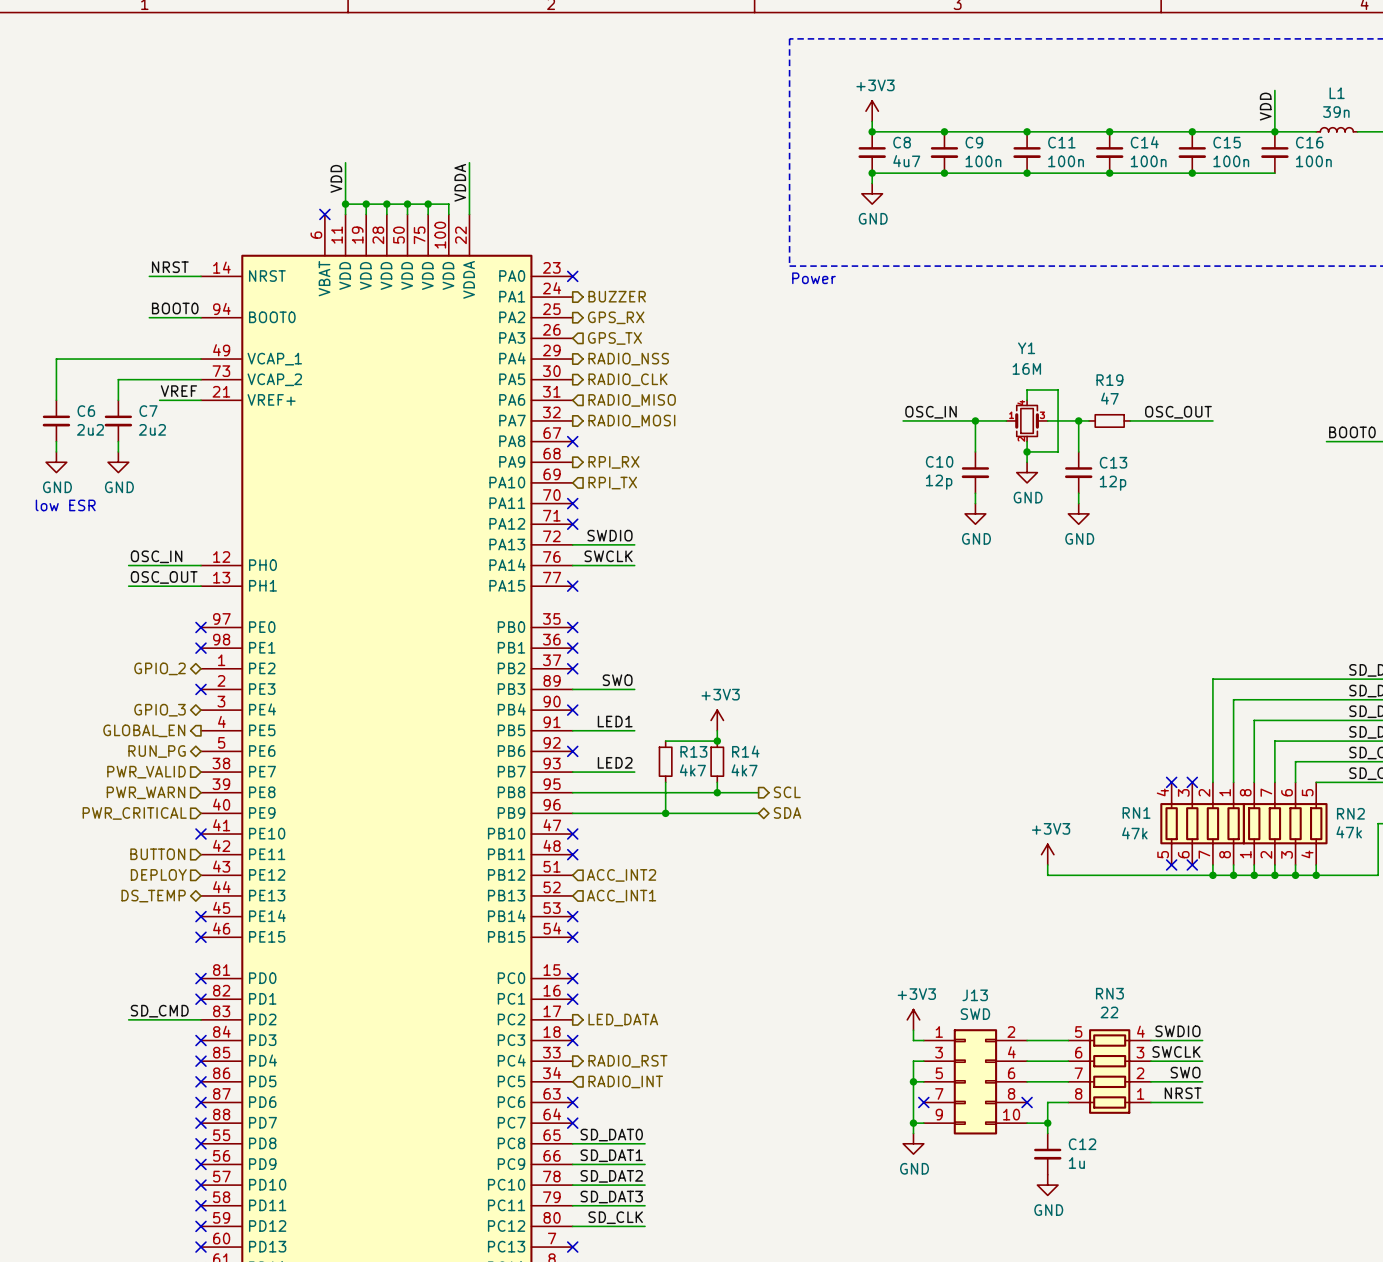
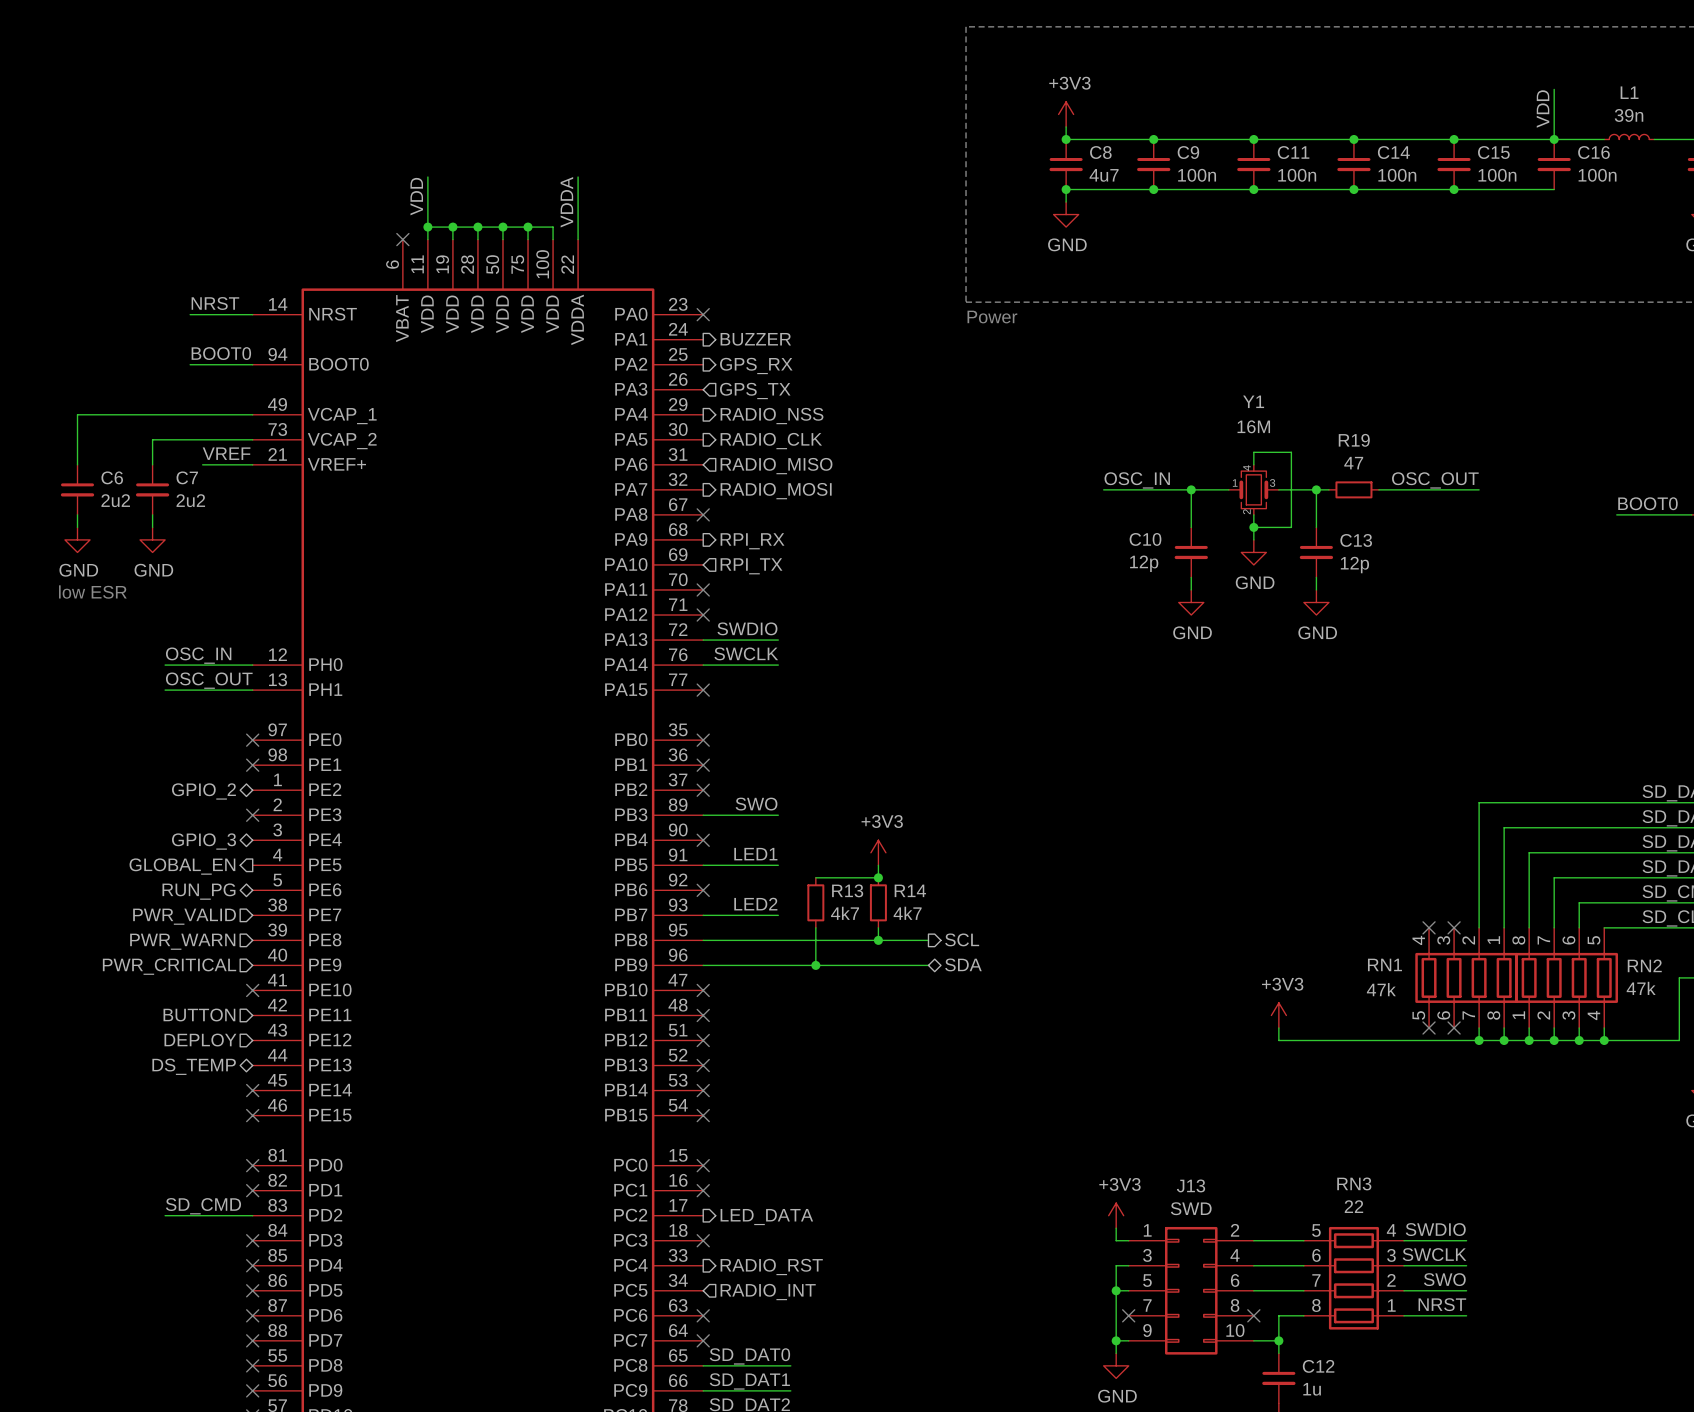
no-connect mark: none -> (703, 1040)
hierarchical label: ACC_INT2 (621, 875) -> none
no-connect mark: none -> (703, 1065)
hierarchical label: ACC_INT1 (621, 896) -> none

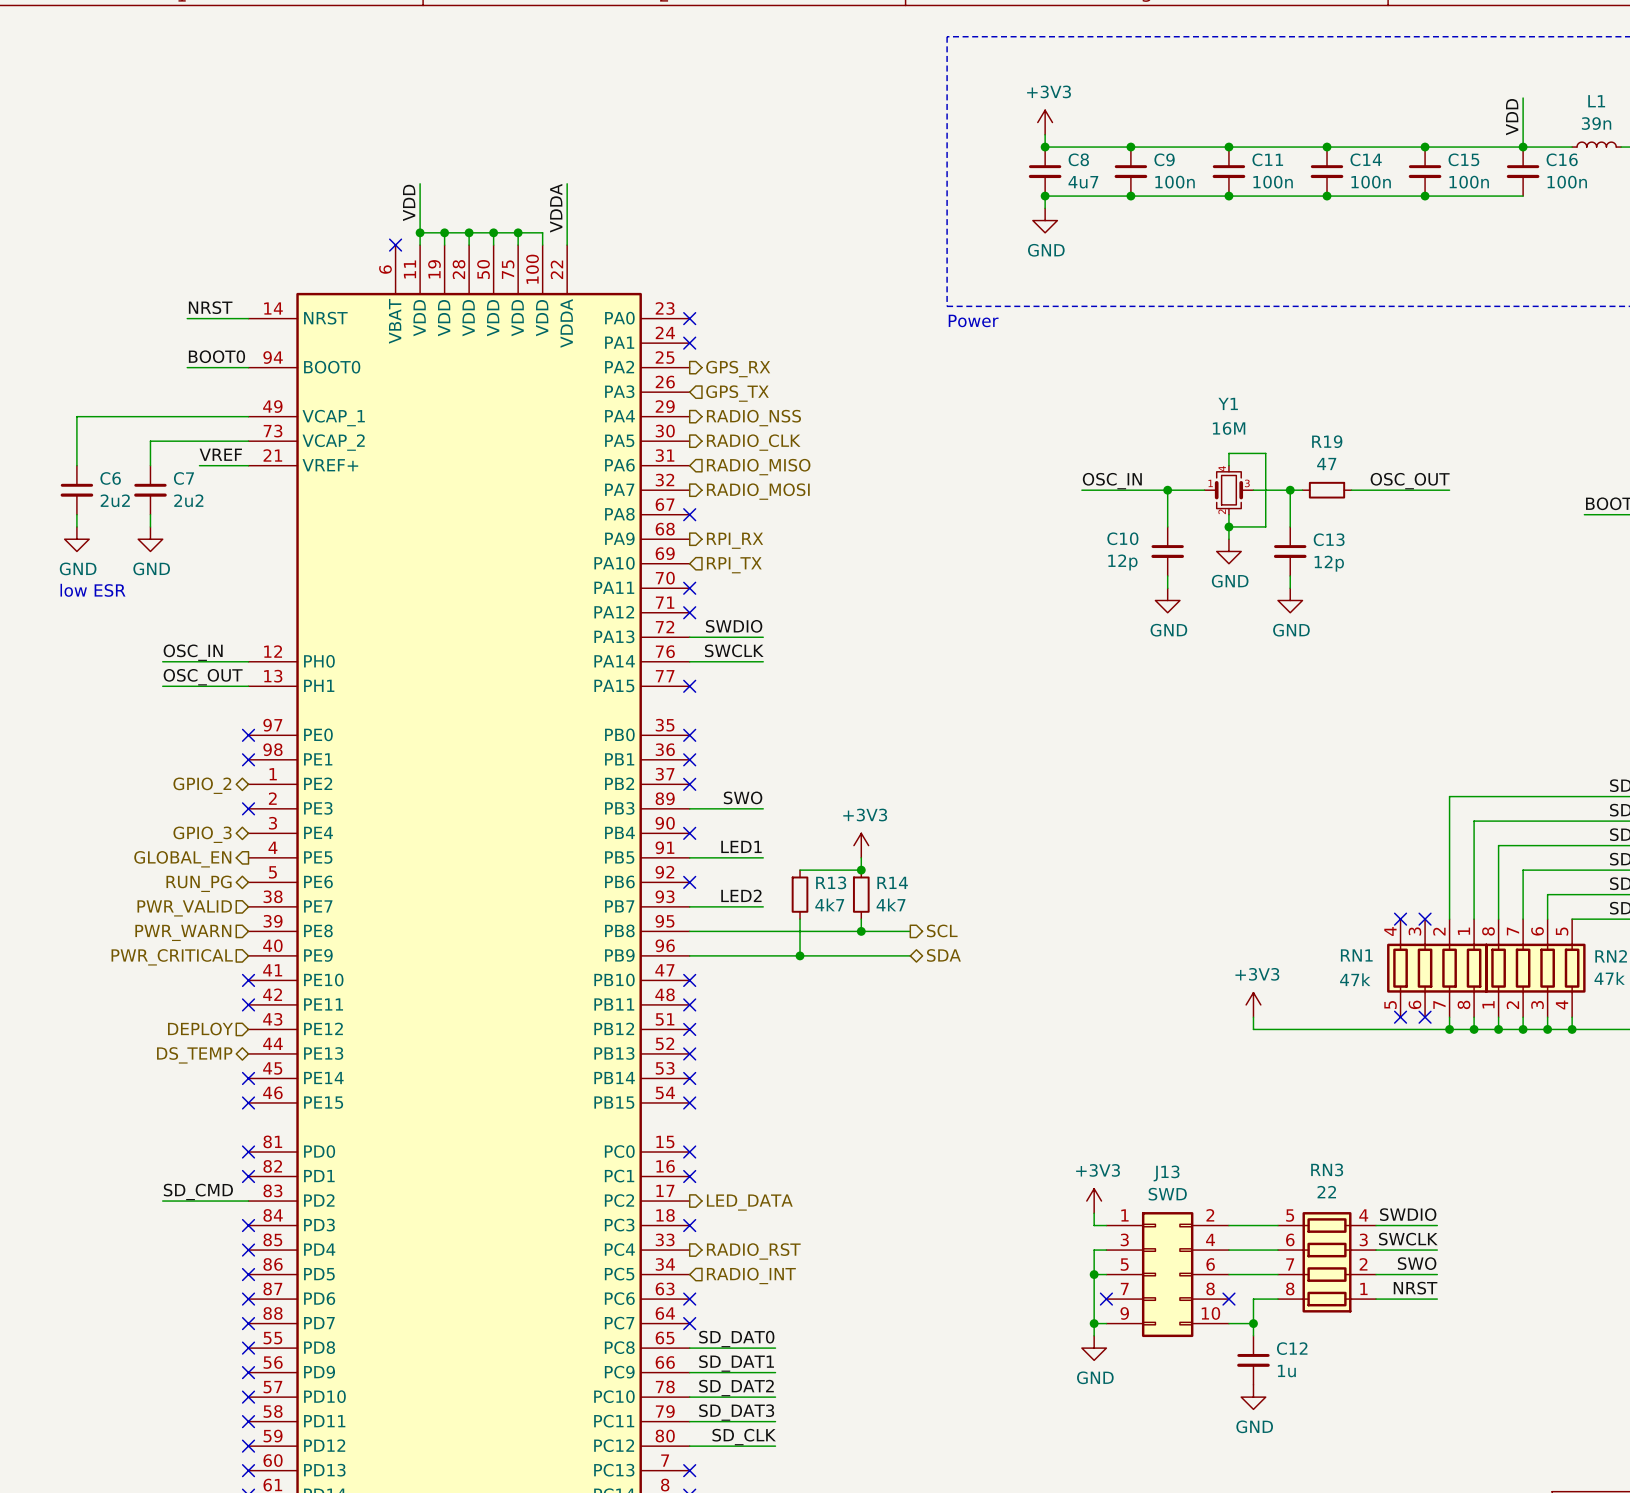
no-connect mark: none -> (689, 343)
hierarchical label: BUZZER (755, 339) -> none
hierarchical label: BUTTON (199, 1015) -> none
no-connect mark: none -> (248, 1004)

